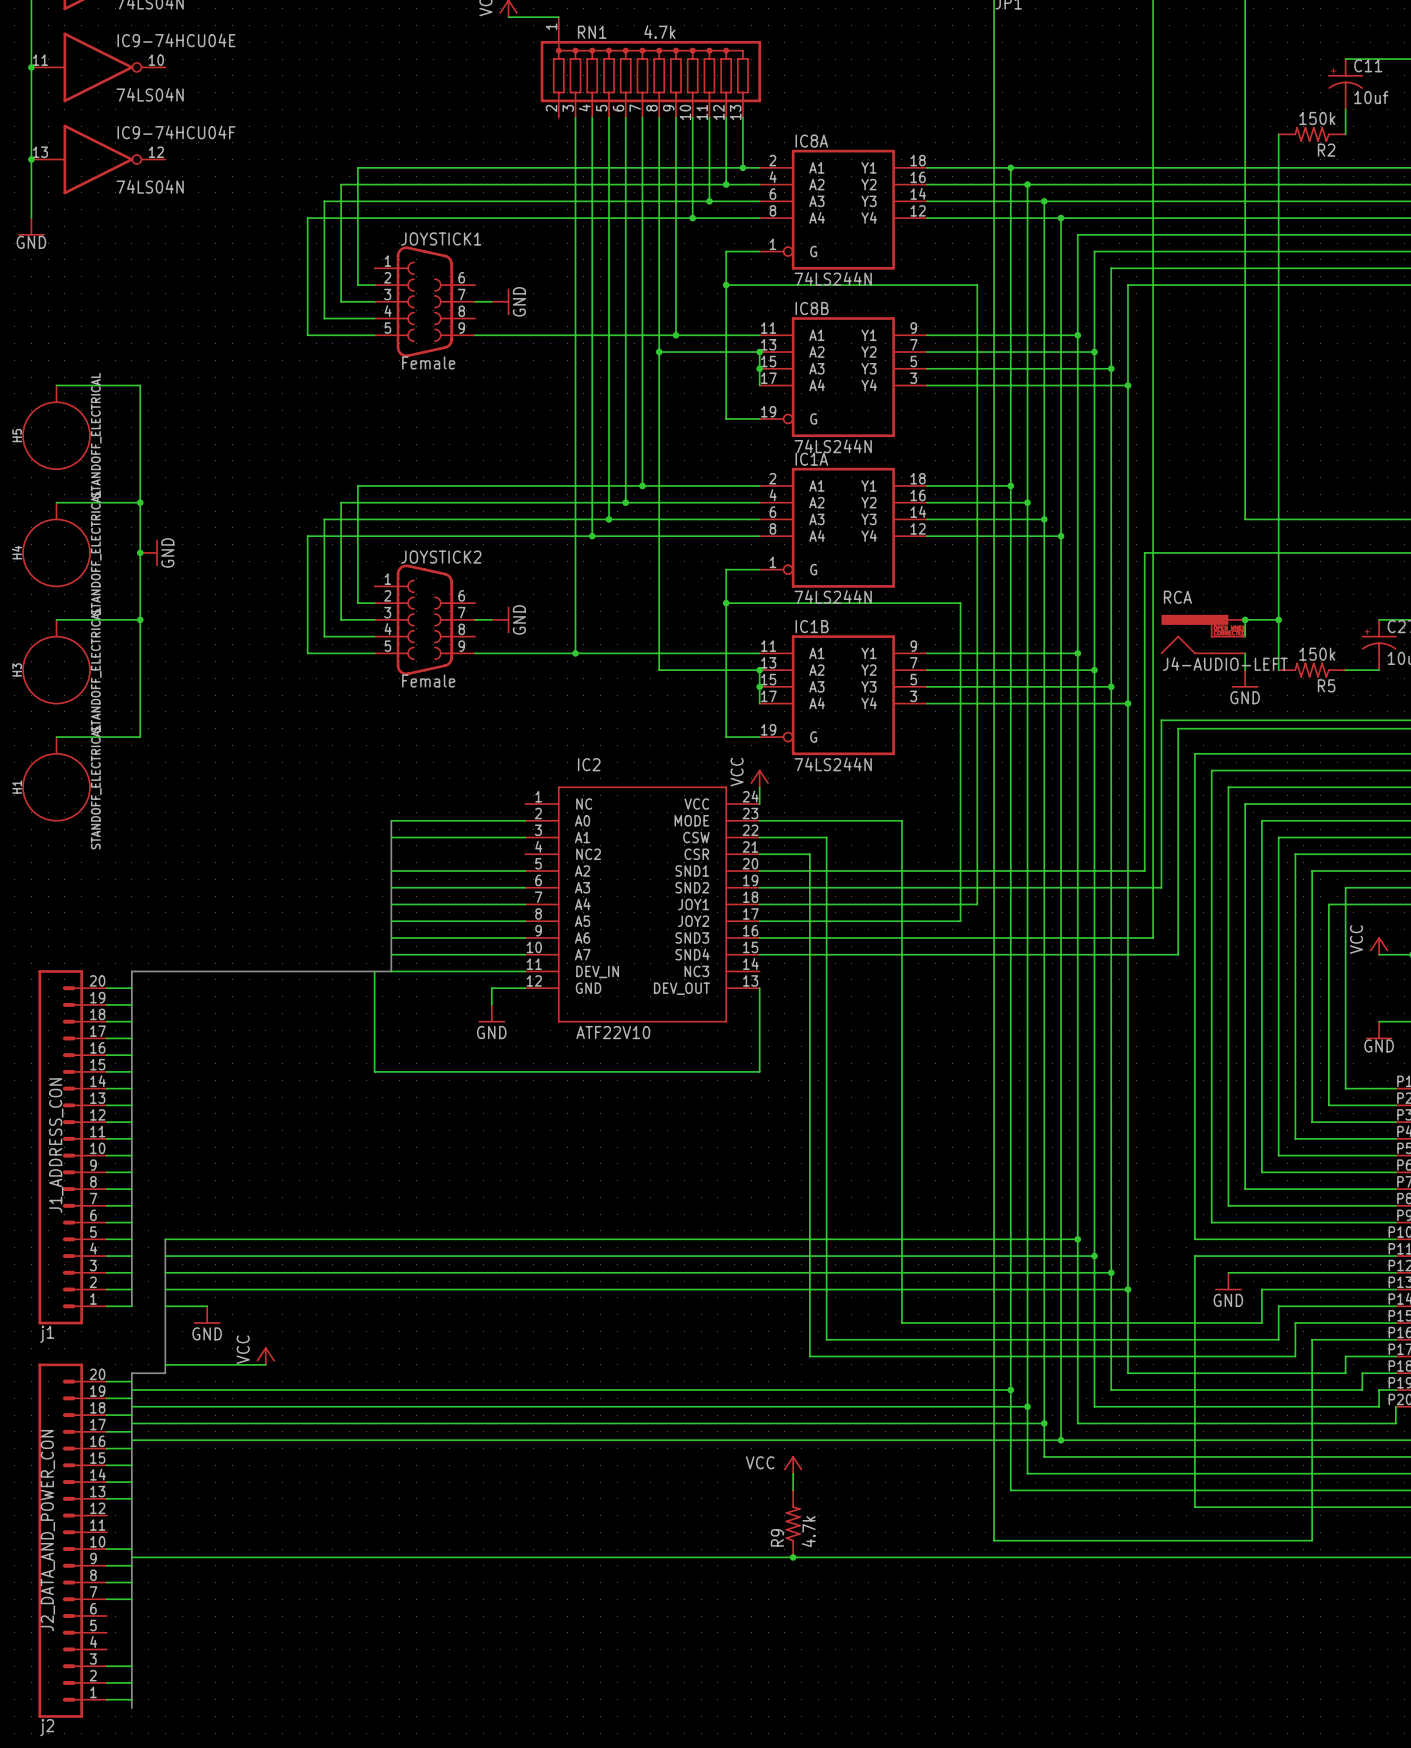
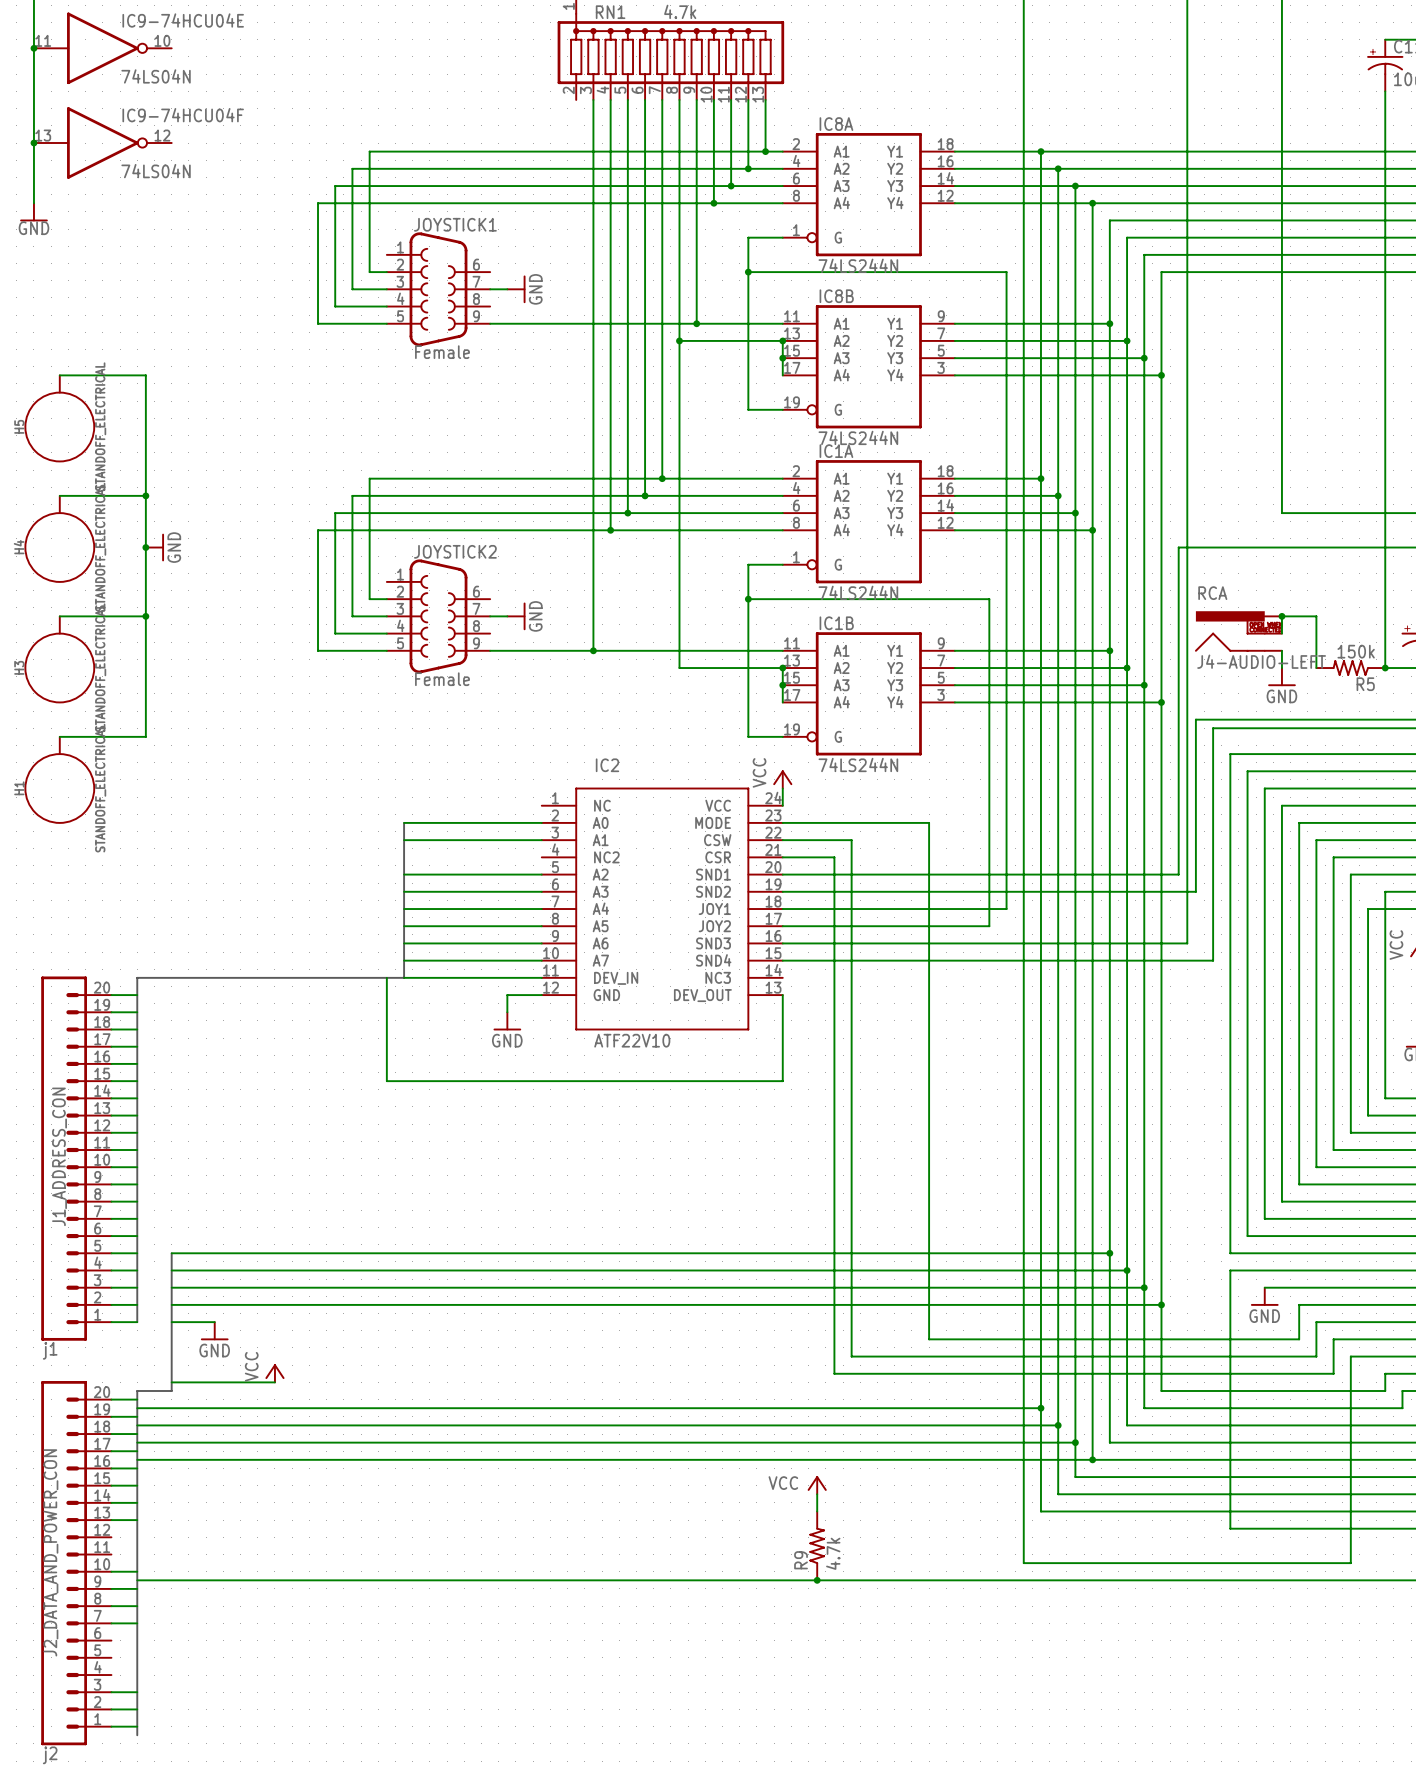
wire: (1278, 134) (1278, 619) -> none
R2: 150k (1312, 134) -> none
wire: none -> (1385, 117) (1385, 668)
junction: (1278, 619) -> none
junction: none -> (1385, 668)

